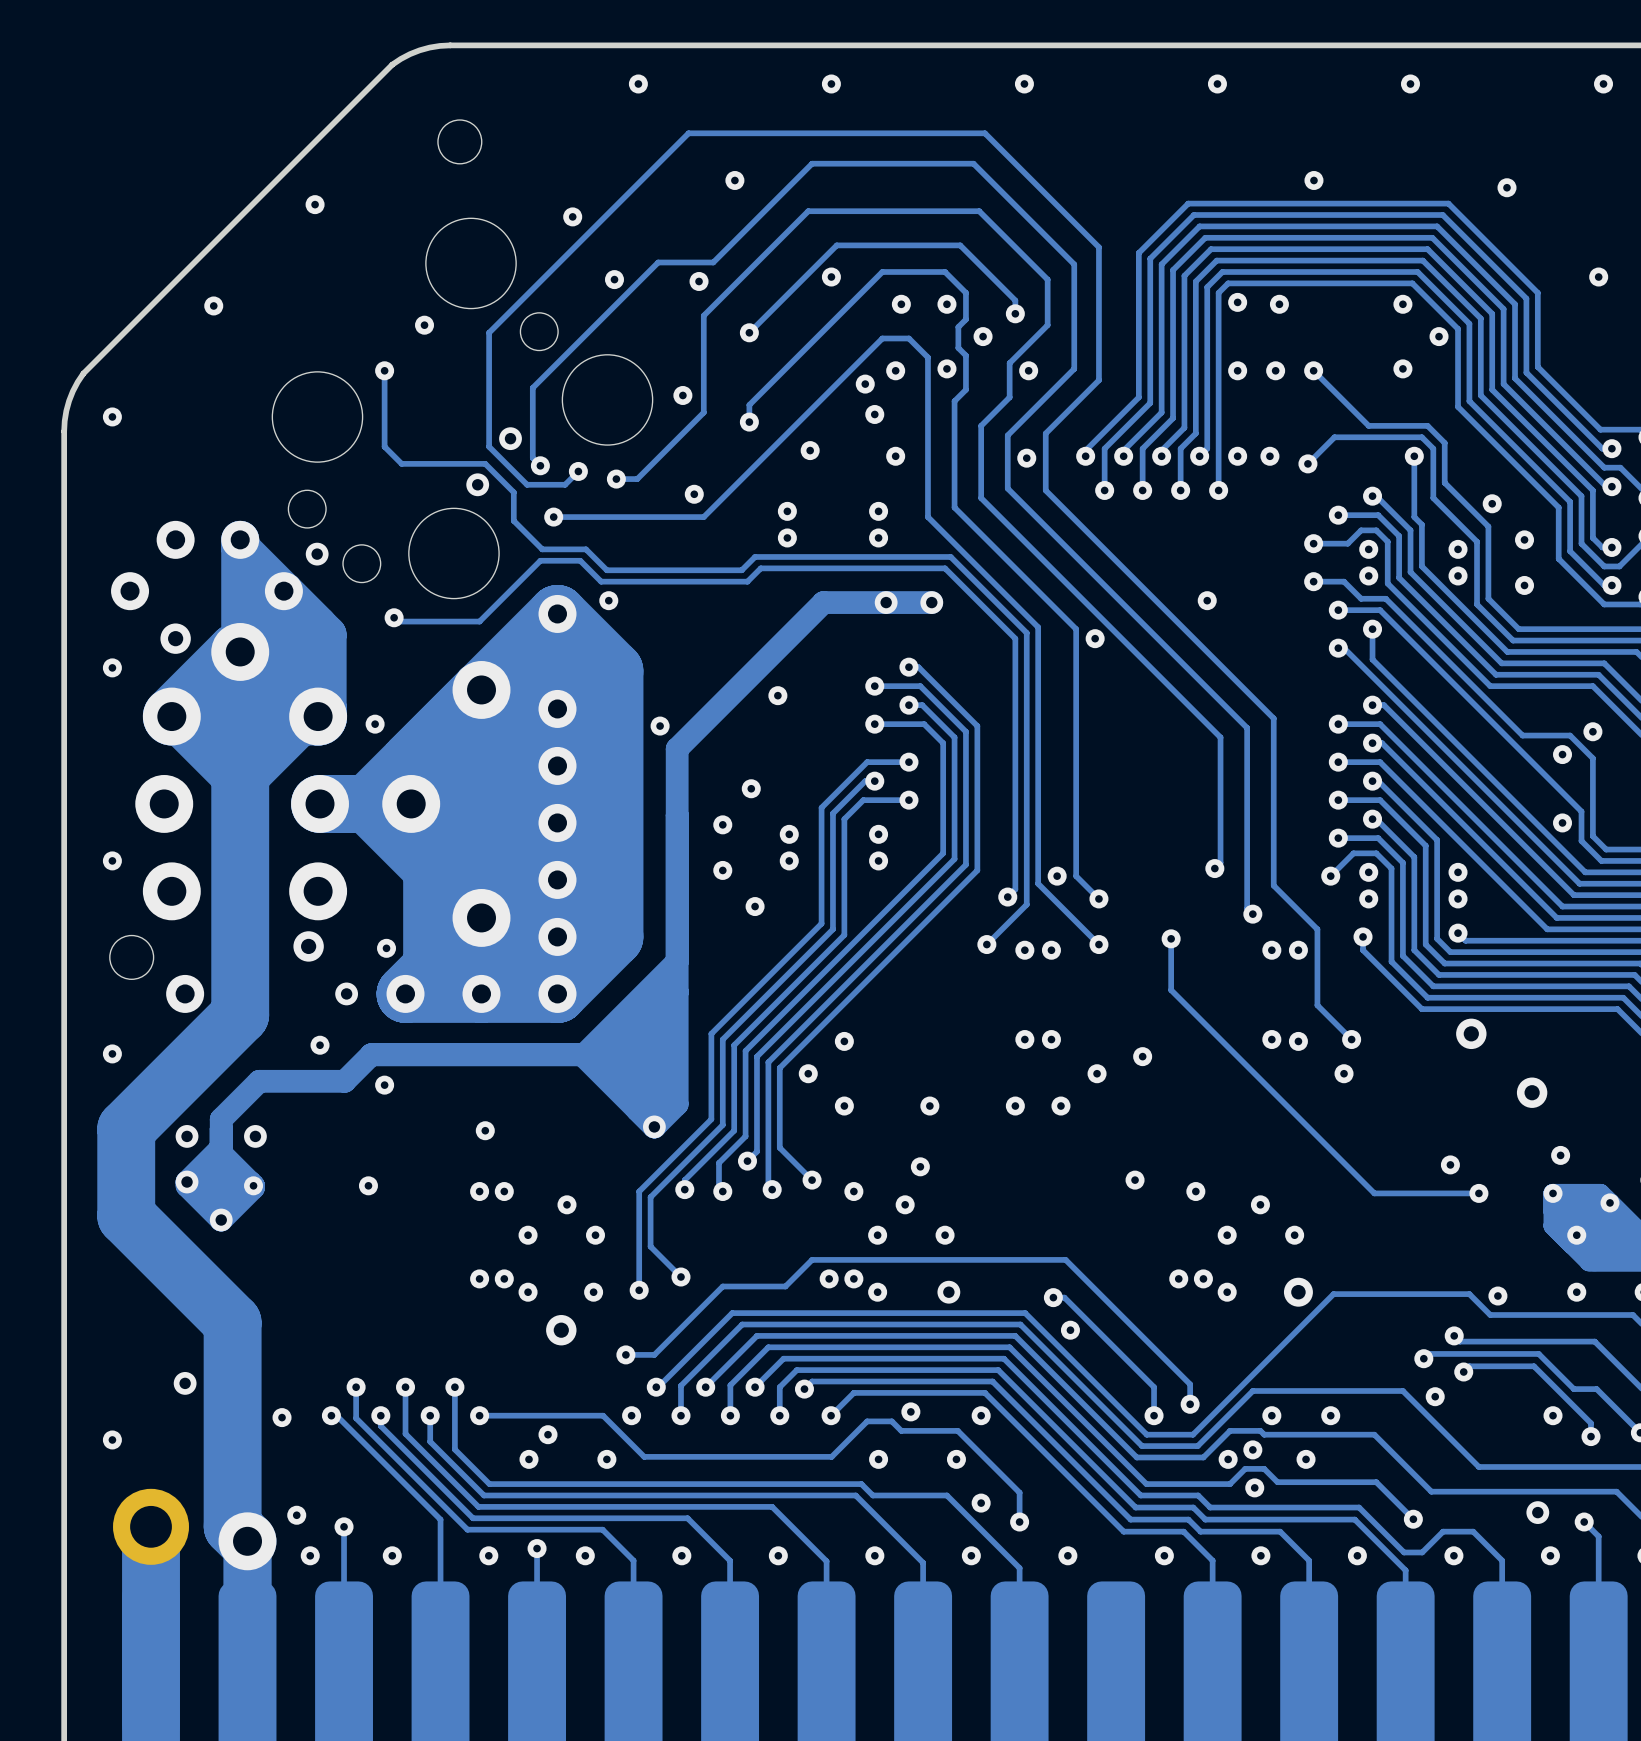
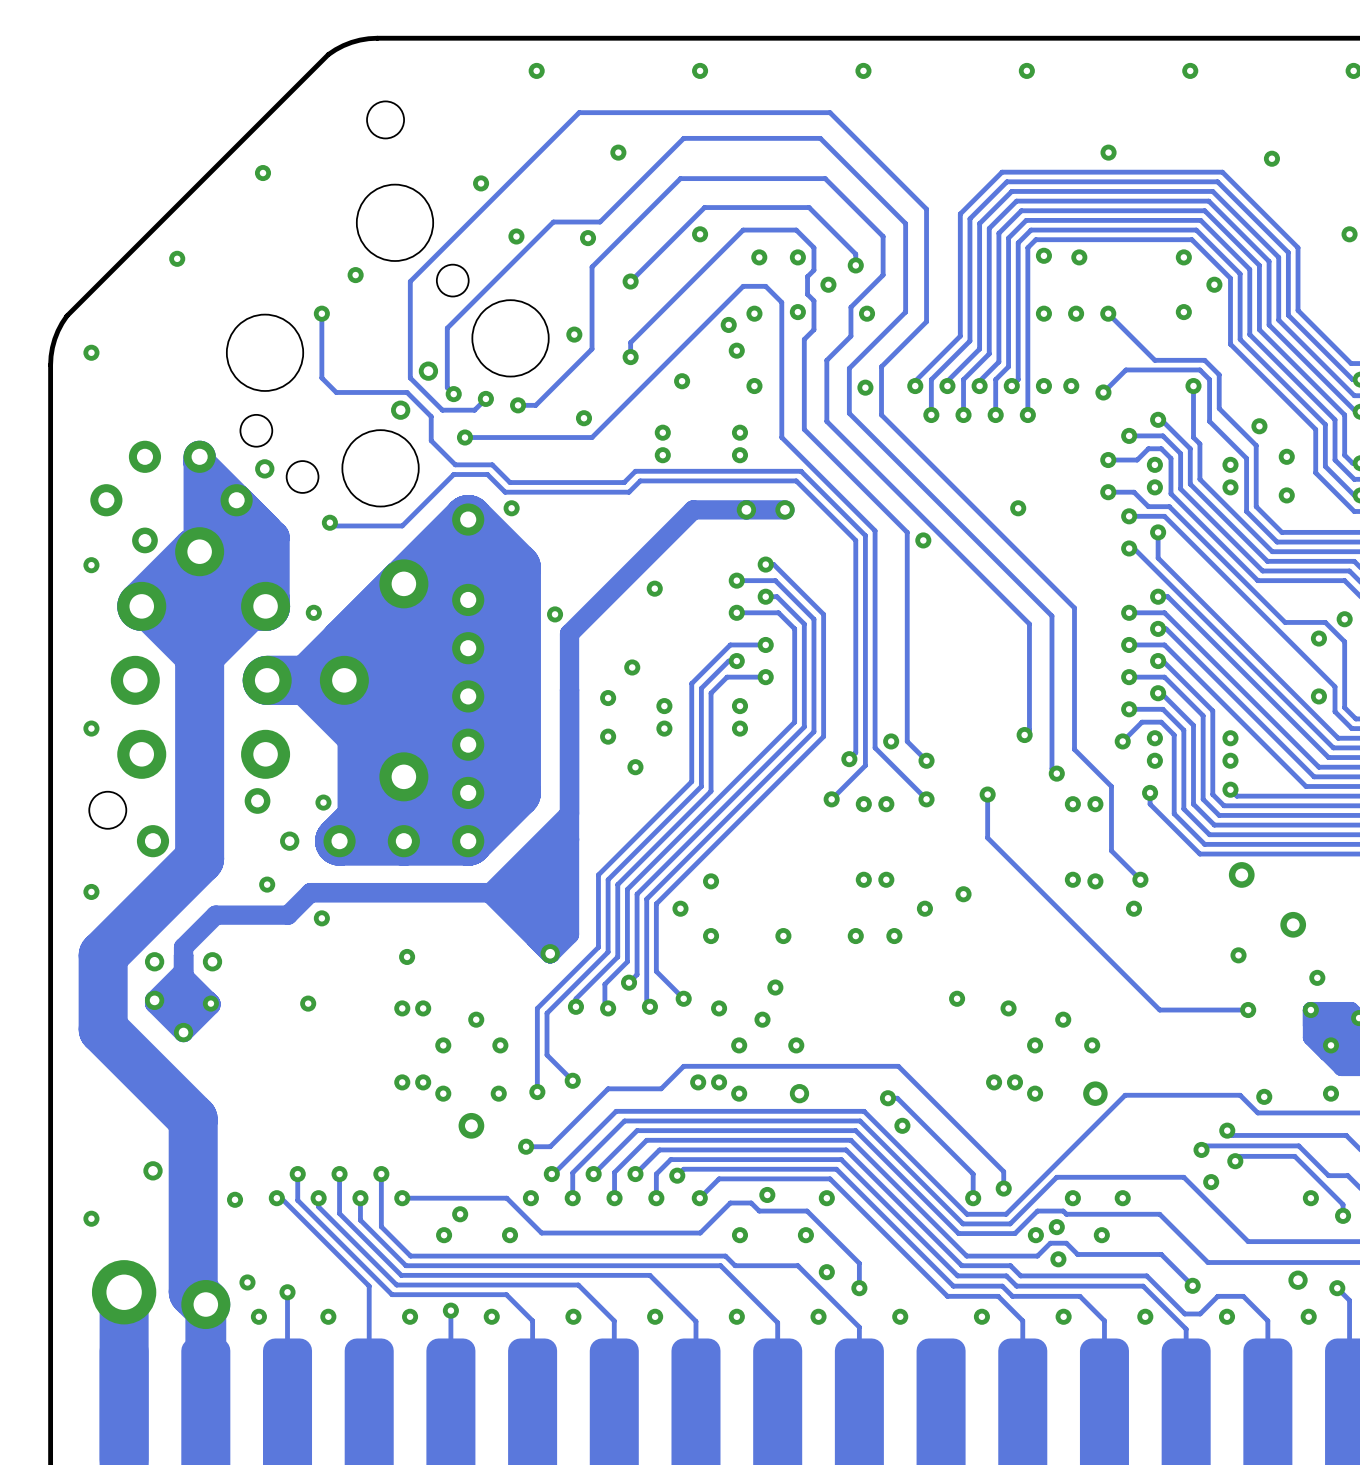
via position: (1450, 1164) -> (1238, 955)

